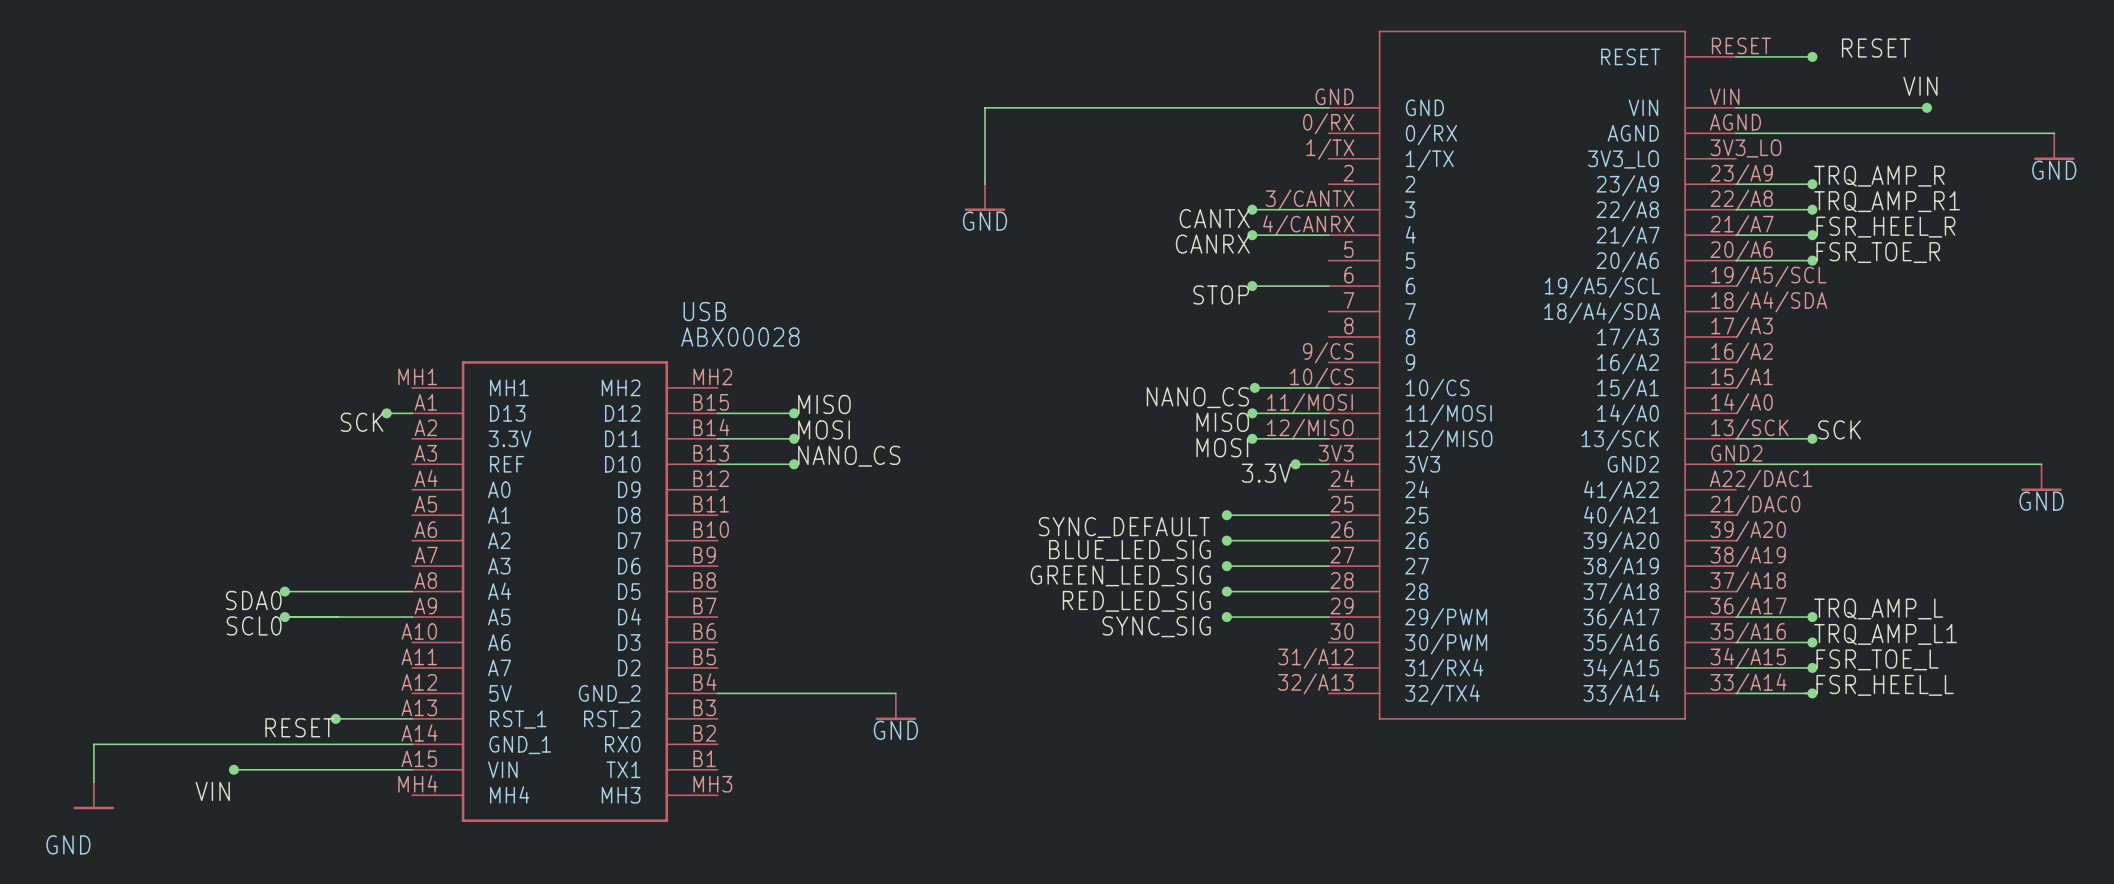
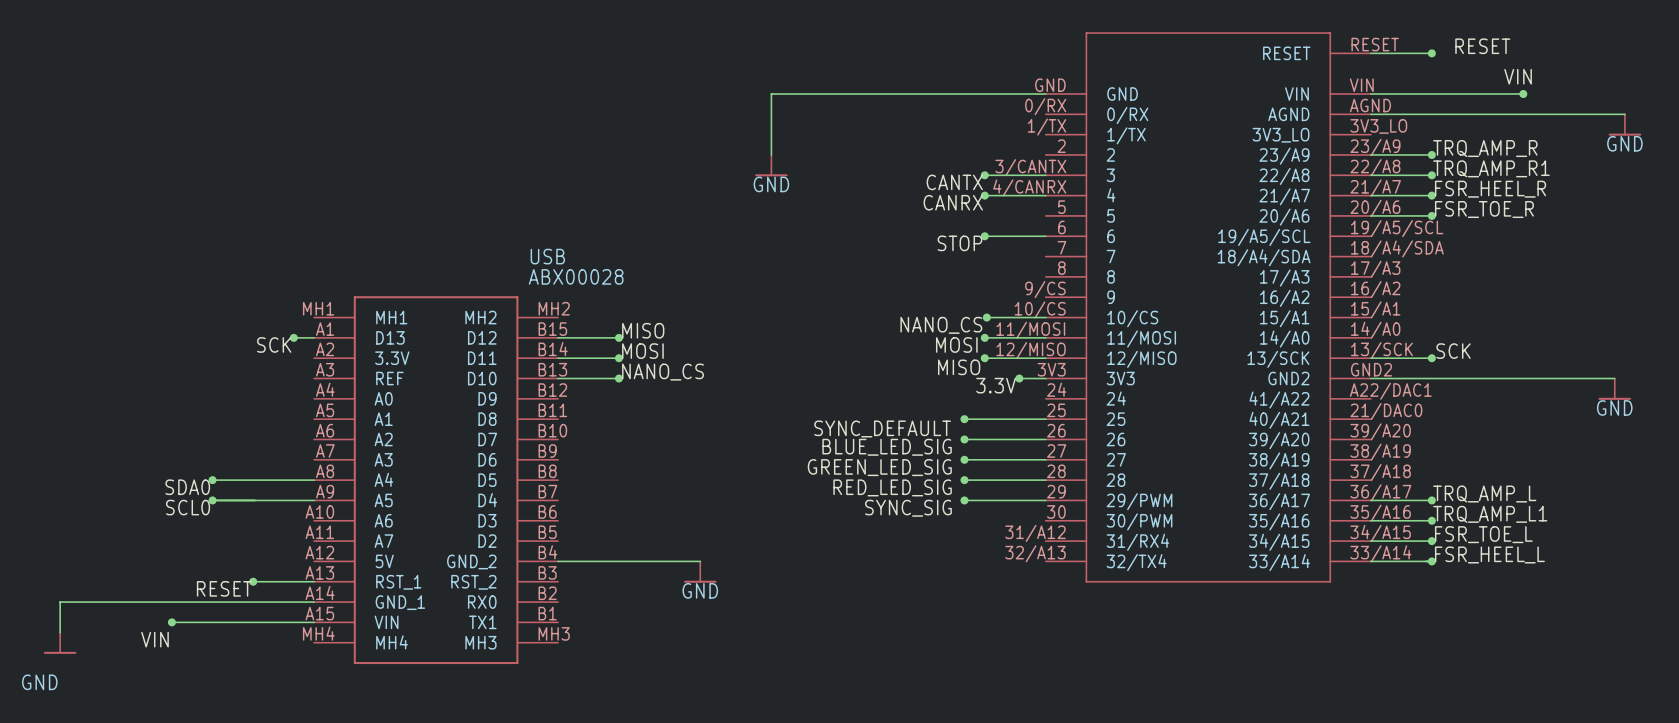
label: MISO (1222, 422) -> MOSI (956, 344)
label: MOSI (1222, 447) -> MISO (959, 367)

